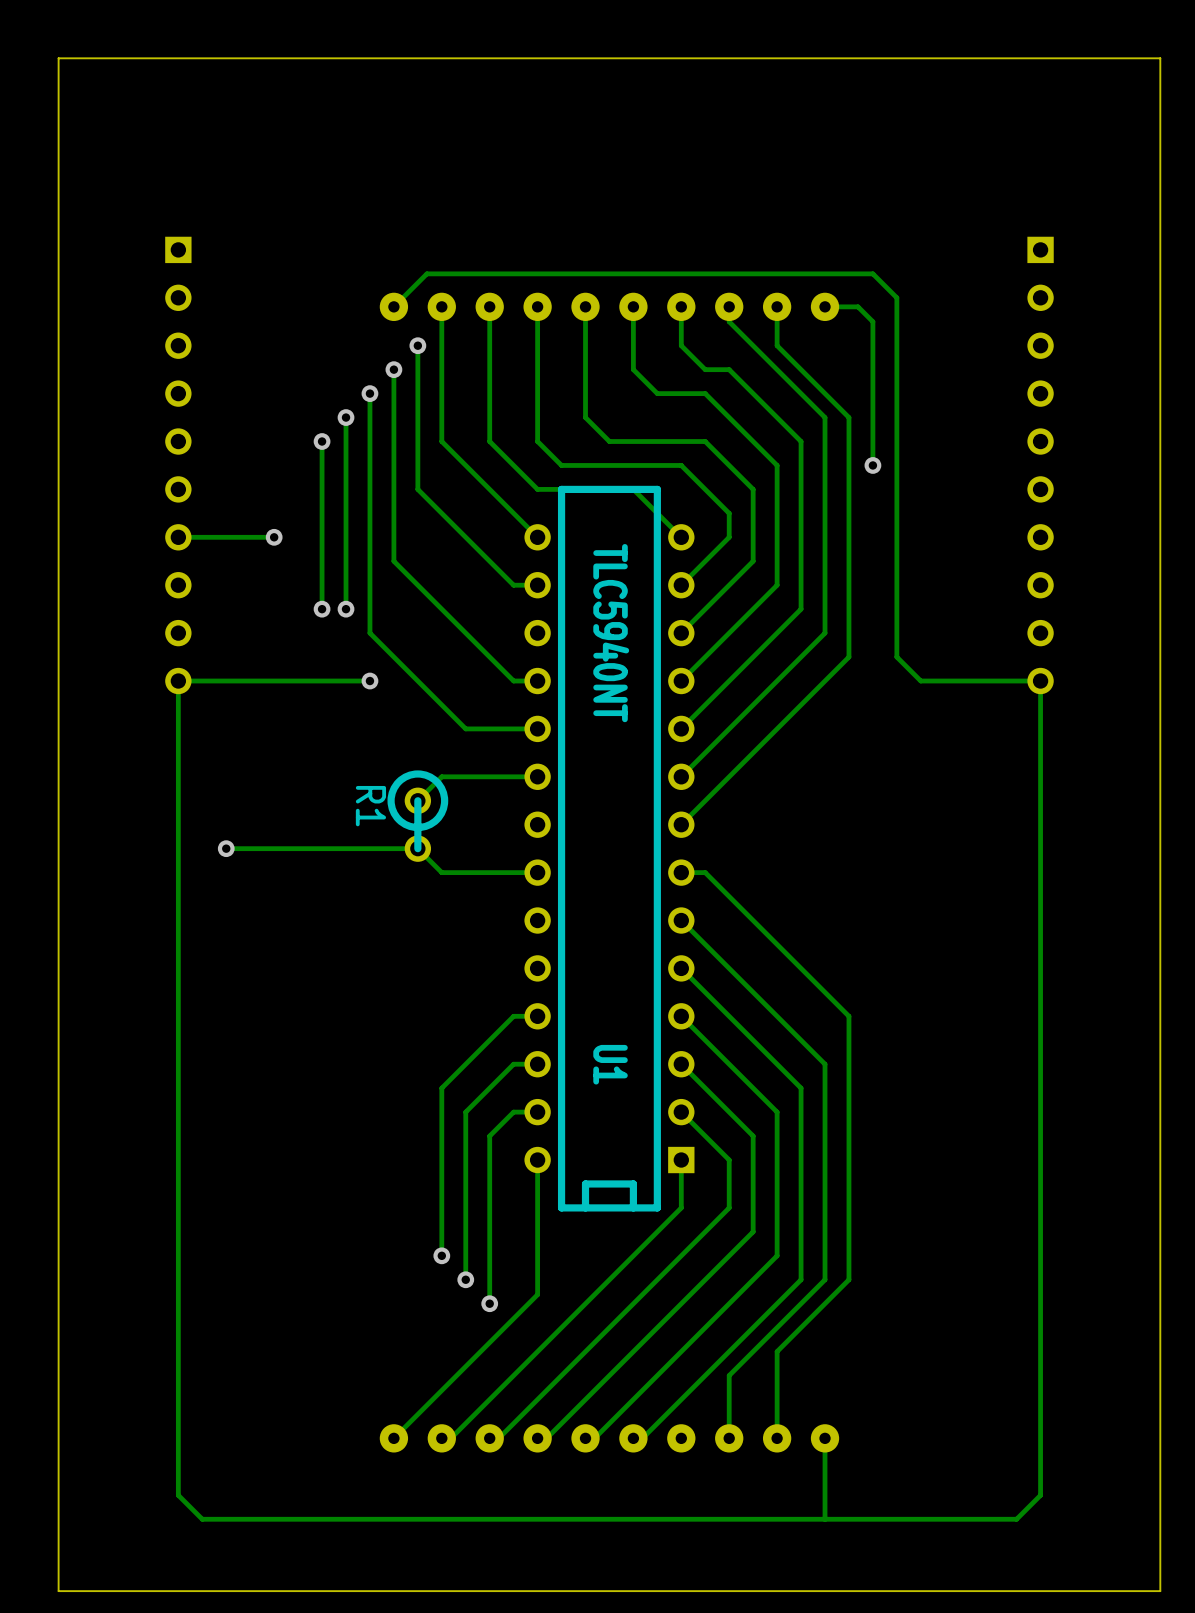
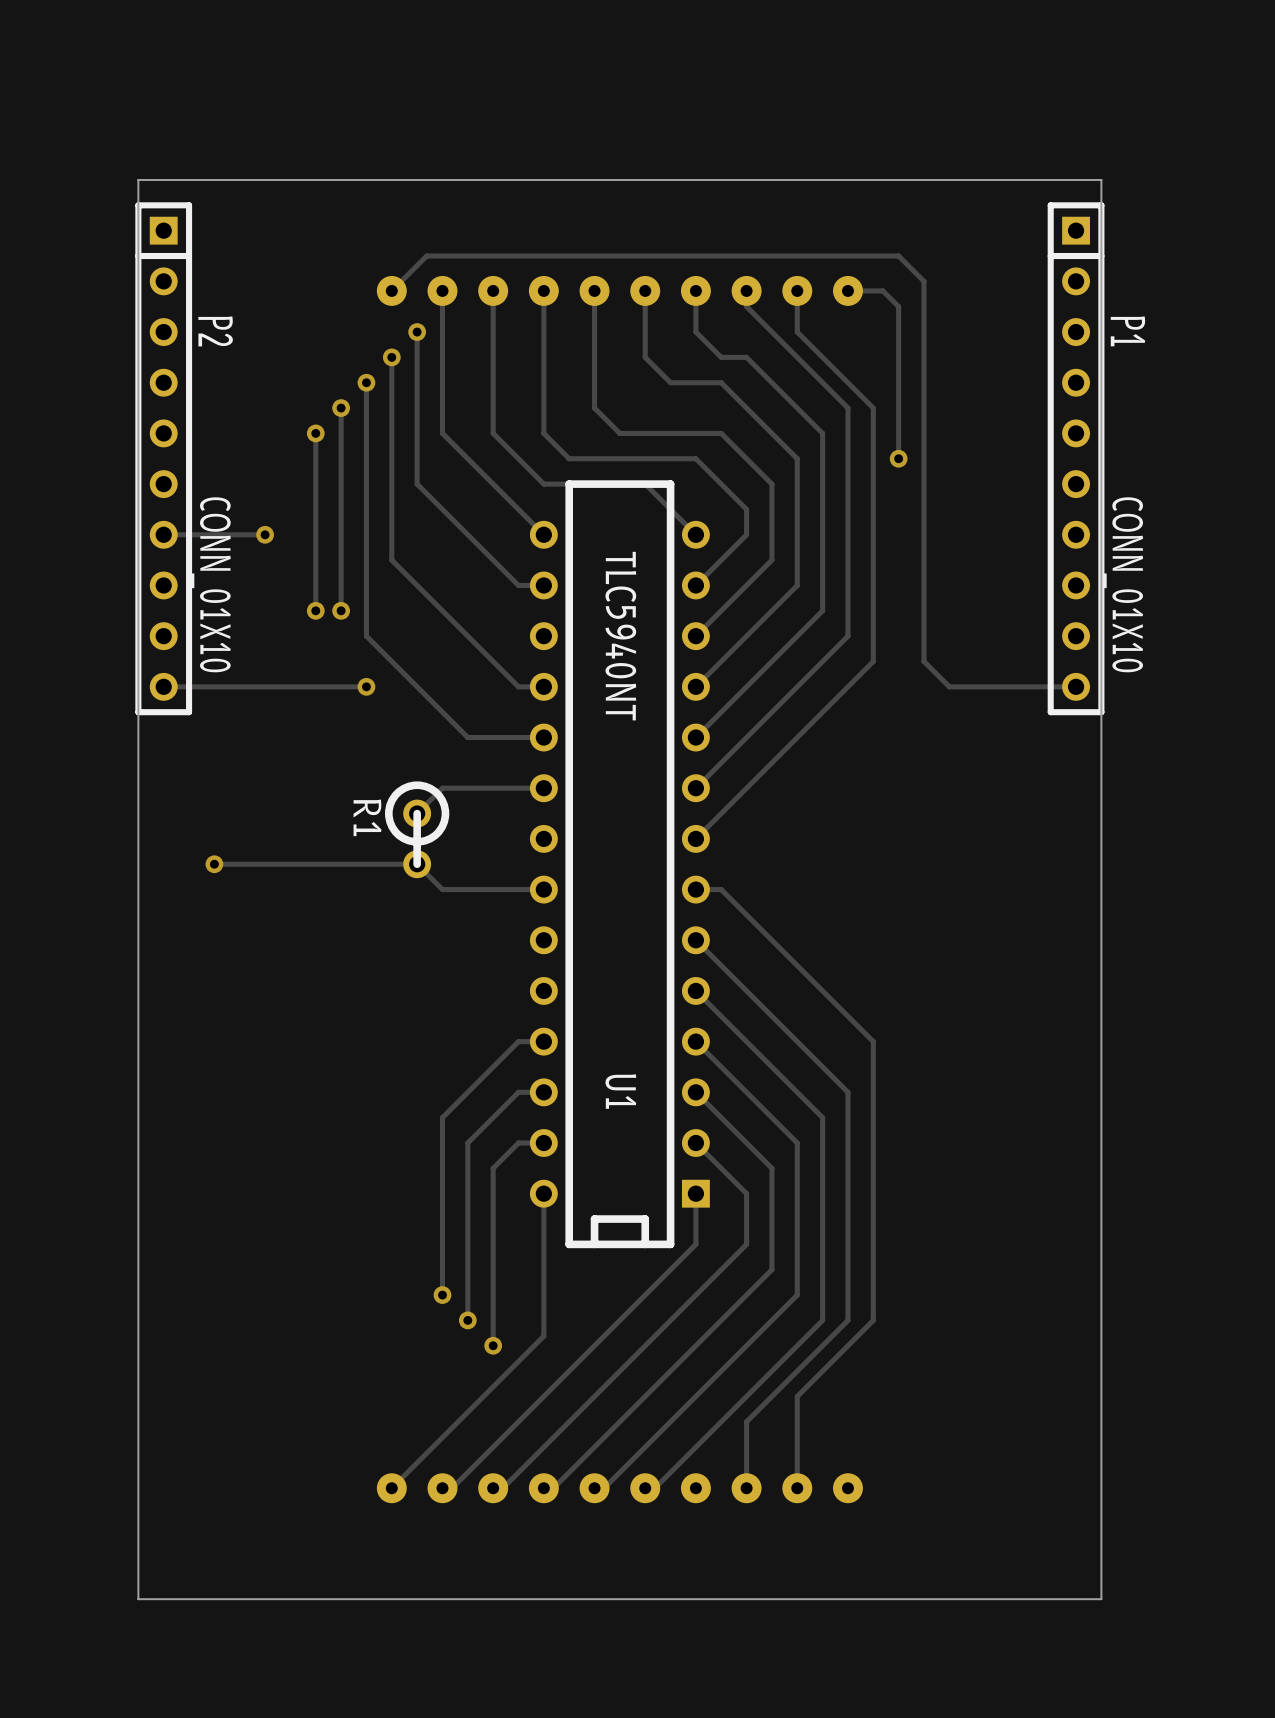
board edge: (1160, 58) (58, 58) (58, 1591) (1160, 1591) (1160, 58) -> (1101, 179) (1101, 1599) (138, 1599) (138, 179) (1101, 179)
P2 side: top (178, 465) -> bottom (163, 458)
P1 side: top (1040, 465) -> bottom (1076, 458)
track: (1040, 681) (1040, 1495) (1016, 1519) (202, 1519) (178, 1495) (178, 681) -> none
track: (825, 1438) (825, 1519) -> none

